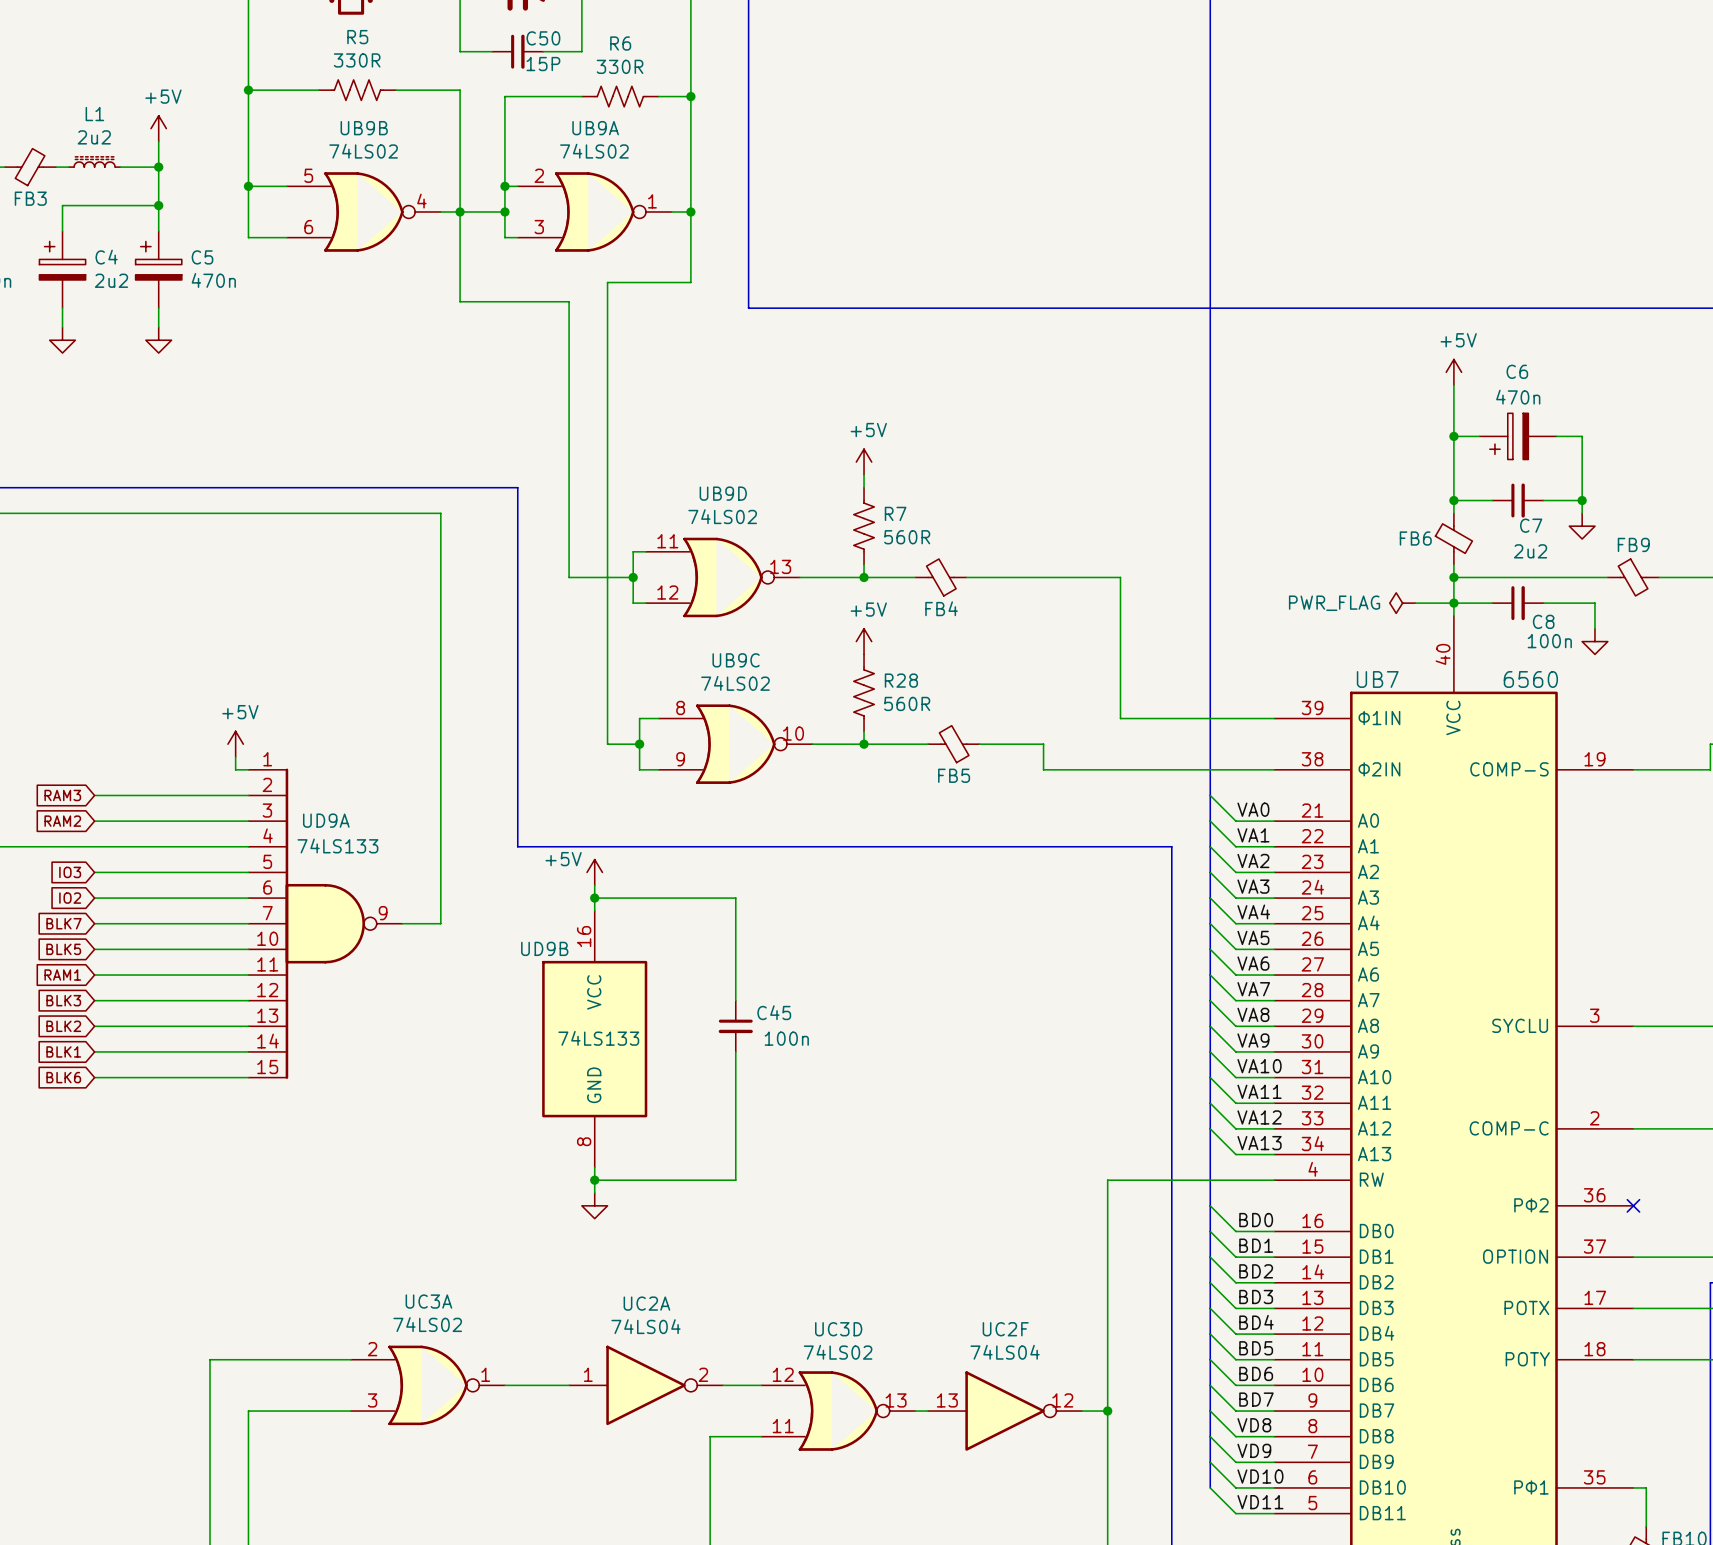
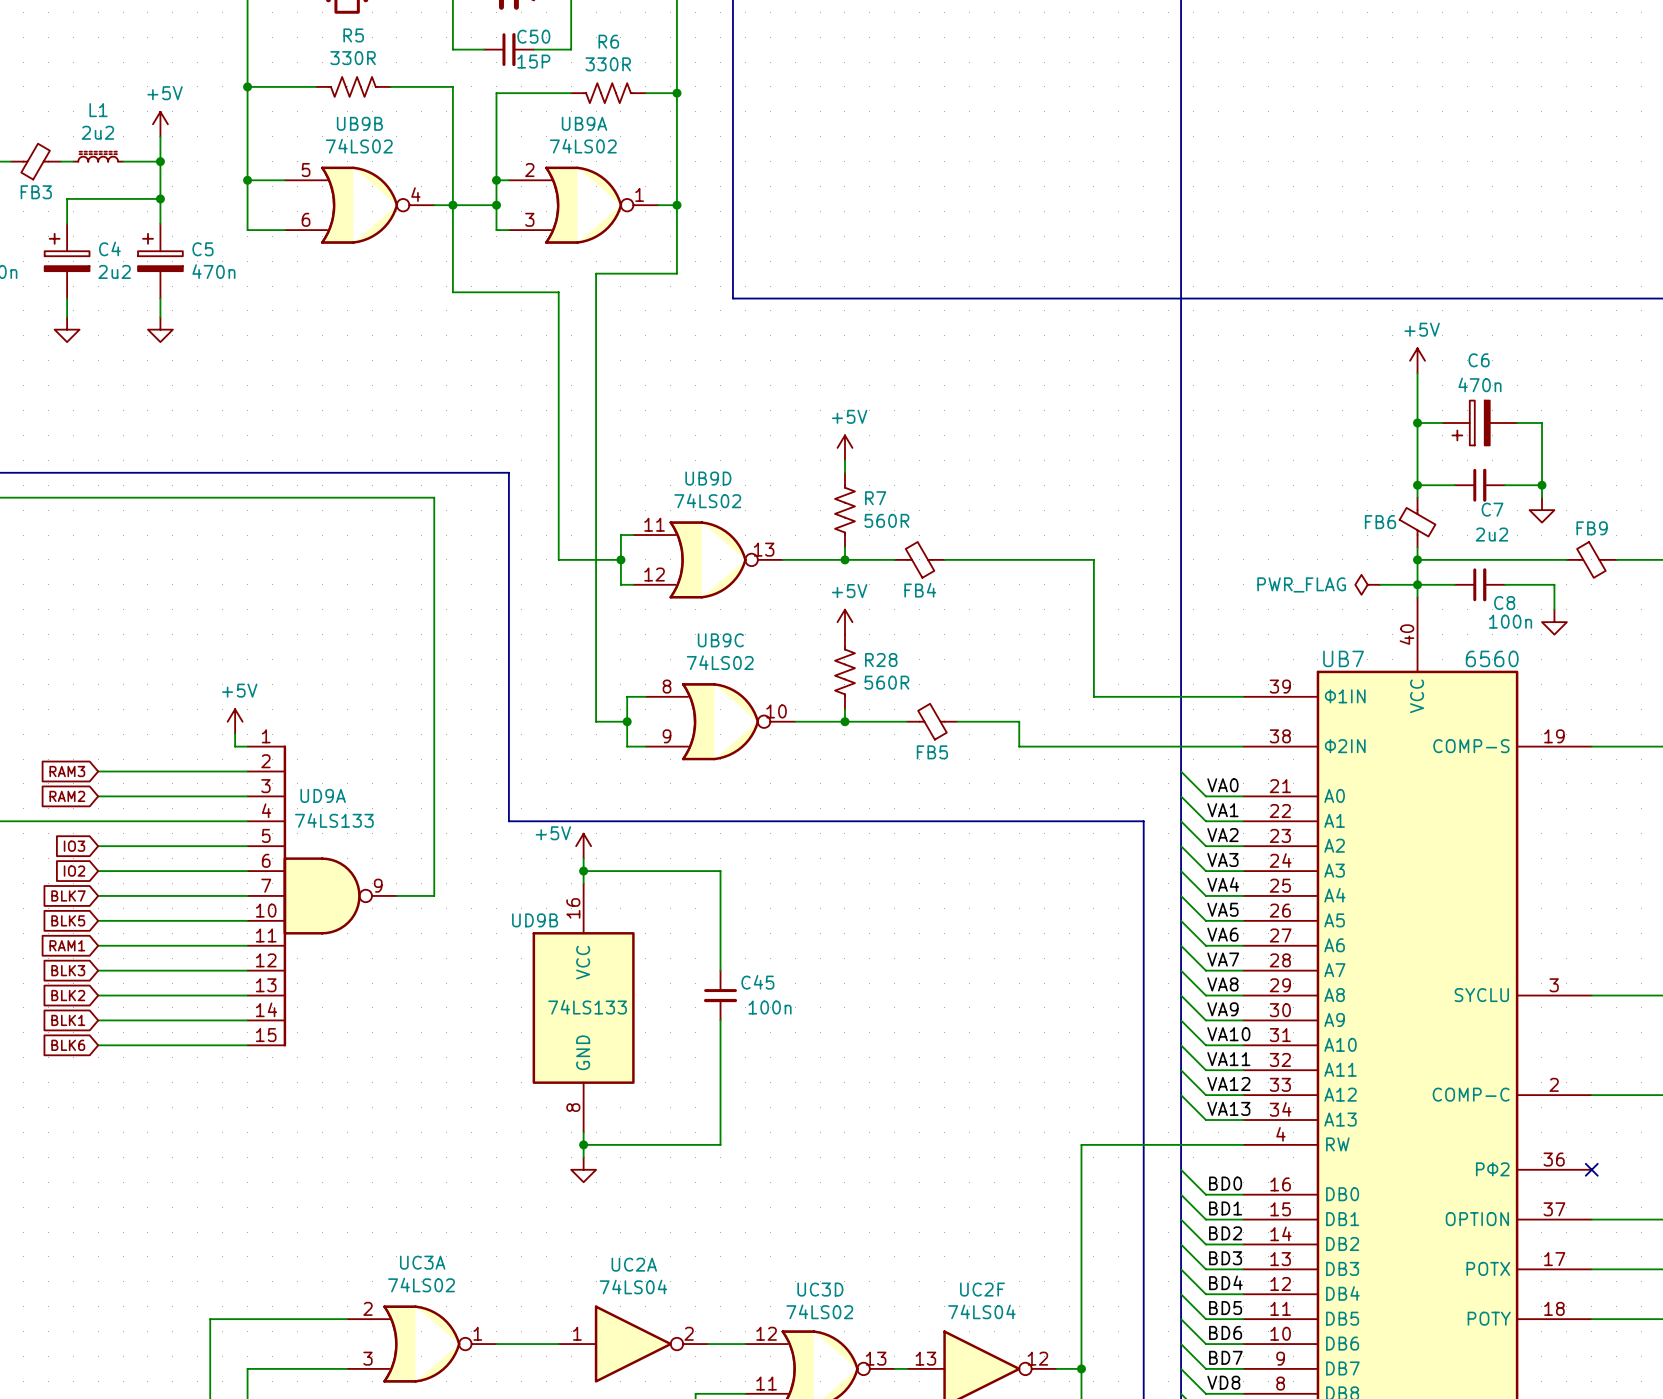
R5 flip: as is (357, 90) -> left-right (353, 86)
R6 flip: as is (620, 96) -> left-right (608, 93)

